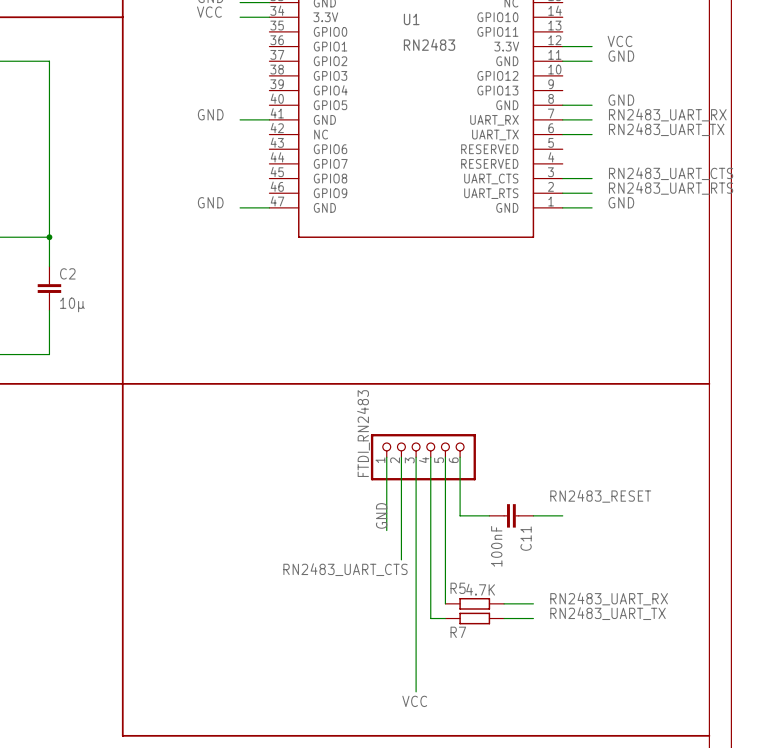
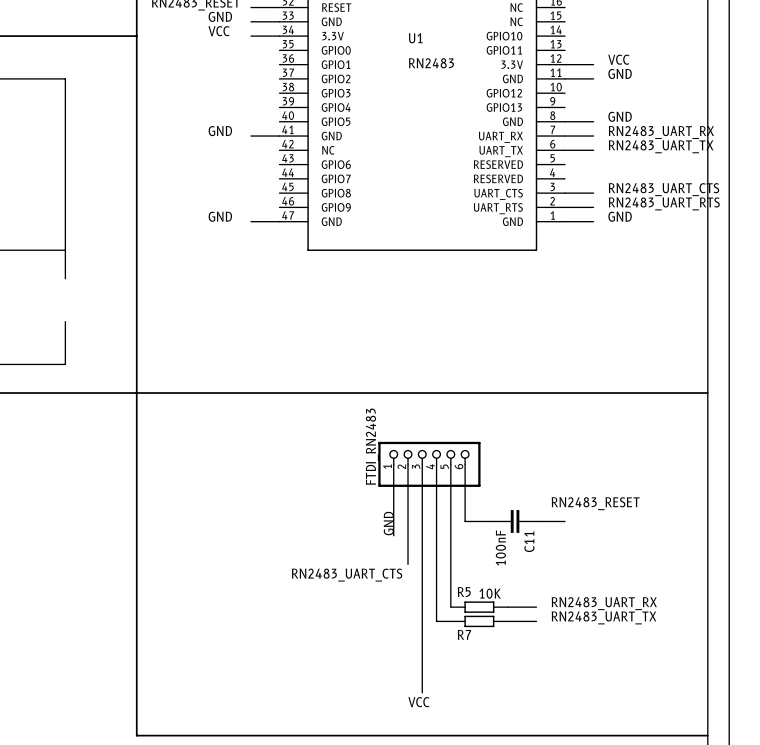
junction: (49, 237) -> none
C2: 10µ (49, 288) -> none
R5 value: 4.7K (480, 589) -> 10K (490, 593)

